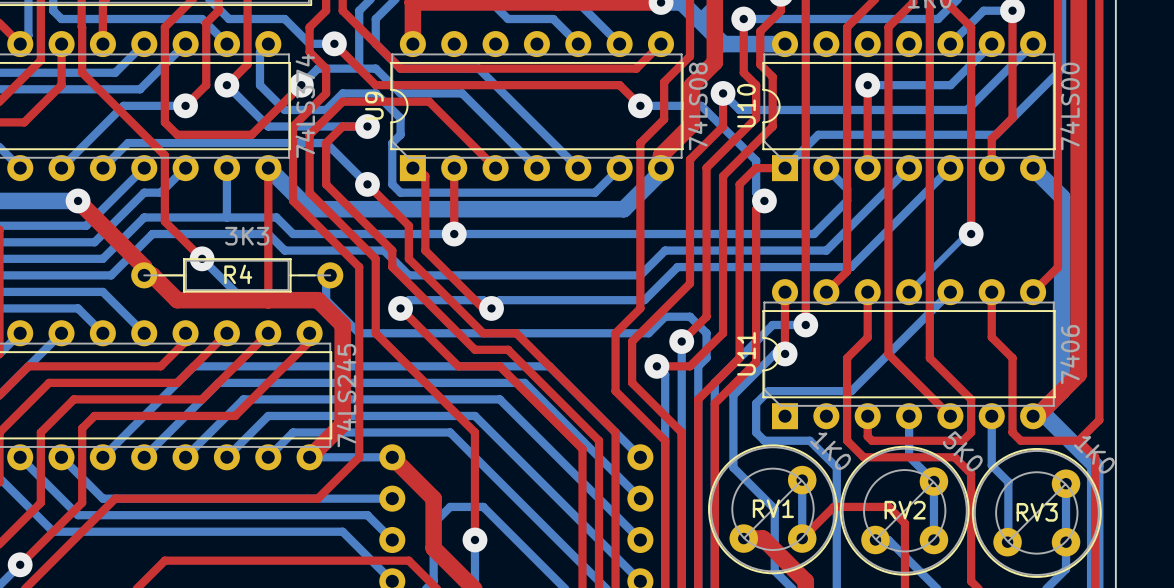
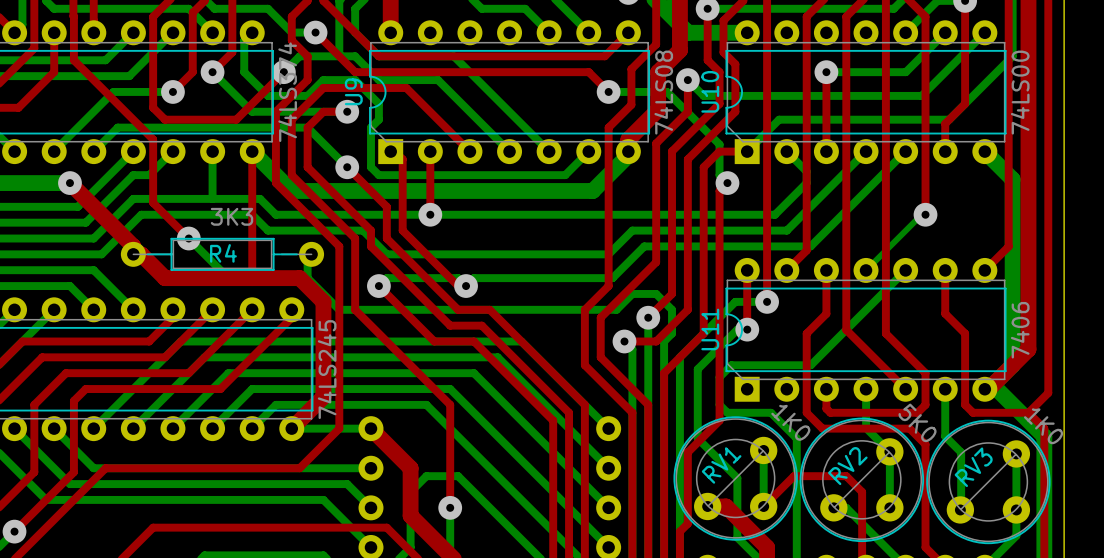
top track: (756, 362) (714, 403) (714, 564) -> (719, 337) (719, 420) (687, 452) (687, 523) (679, 531)
RV1 name rotation: 0° (773, 508) -> 45° counterclockwise (721, 465)
RV2 name rotation: 0° (905, 510) -> 45° counterclockwise (847, 466)
RV3 name rotation: 0° (1037, 512) -> 45° counterclockwise (973, 467)

